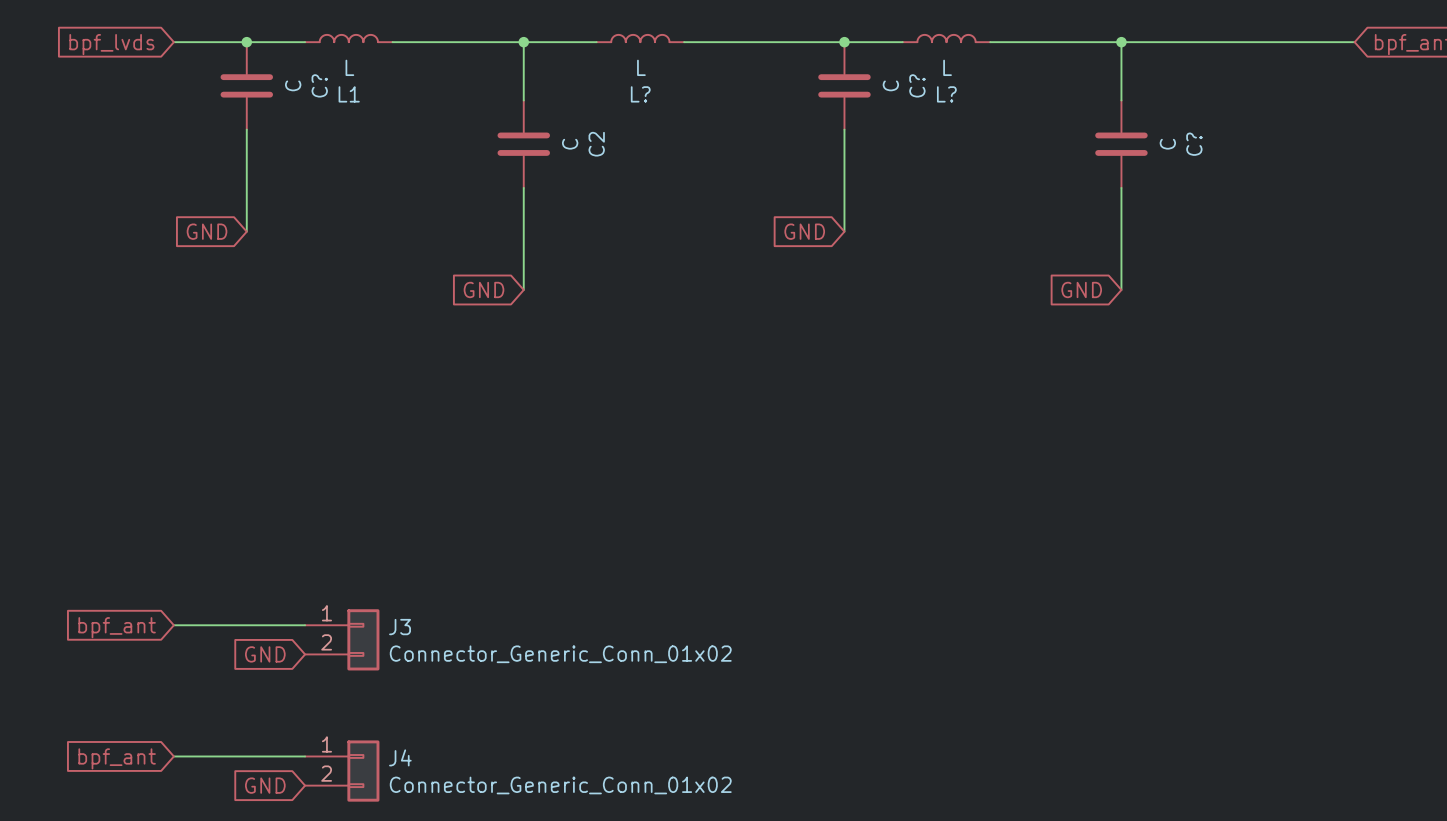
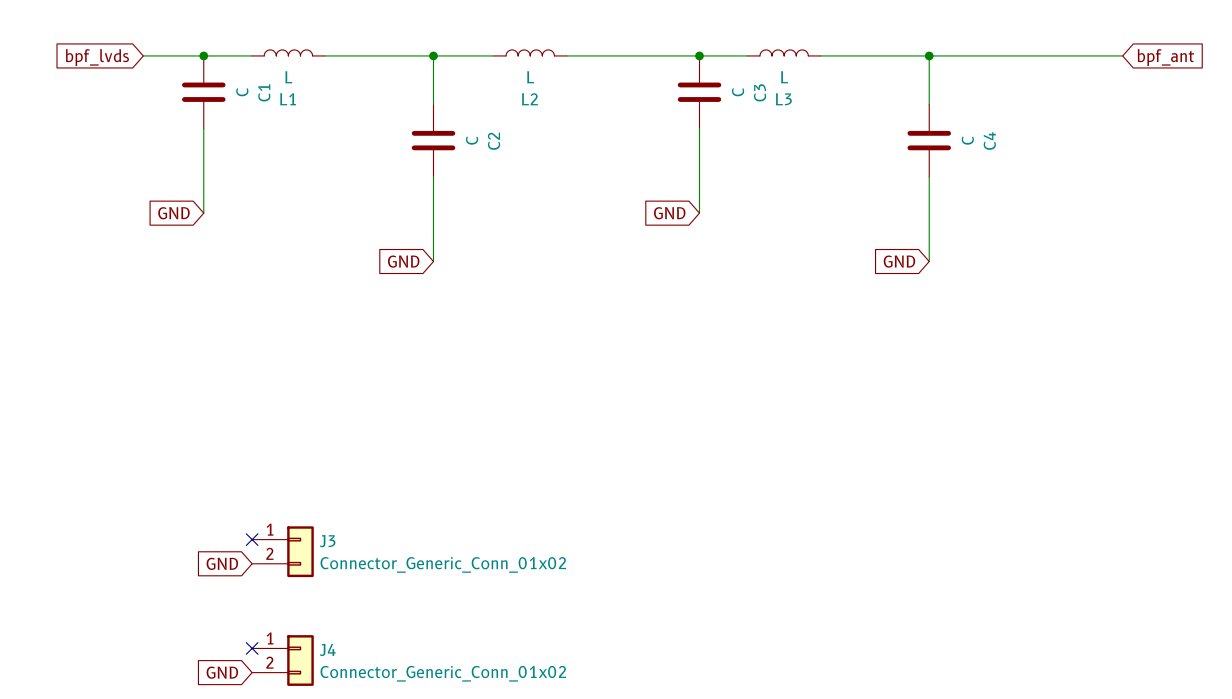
C? name: C? (319, 85) -> C1 (264, 92)
C? name: C? (917, 85) -> C3 (760, 92)
L? name: L? (640, 94) -> L2 (529, 99)
L? name: L? (946, 94) -> L3 (783, 99)
C? name: C? (1194, 144) -> C4 (989, 141)
wire: (173, 625) (305, 625) -> none
no-connect mark: none -> (252, 539)
global label: bpf_ant (117, 627) -> none
wire: (173, 756) (305, 756) -> none
no-connect mark: none -> (252, 648)
global label: bpf_ant (117, 758) -> none

